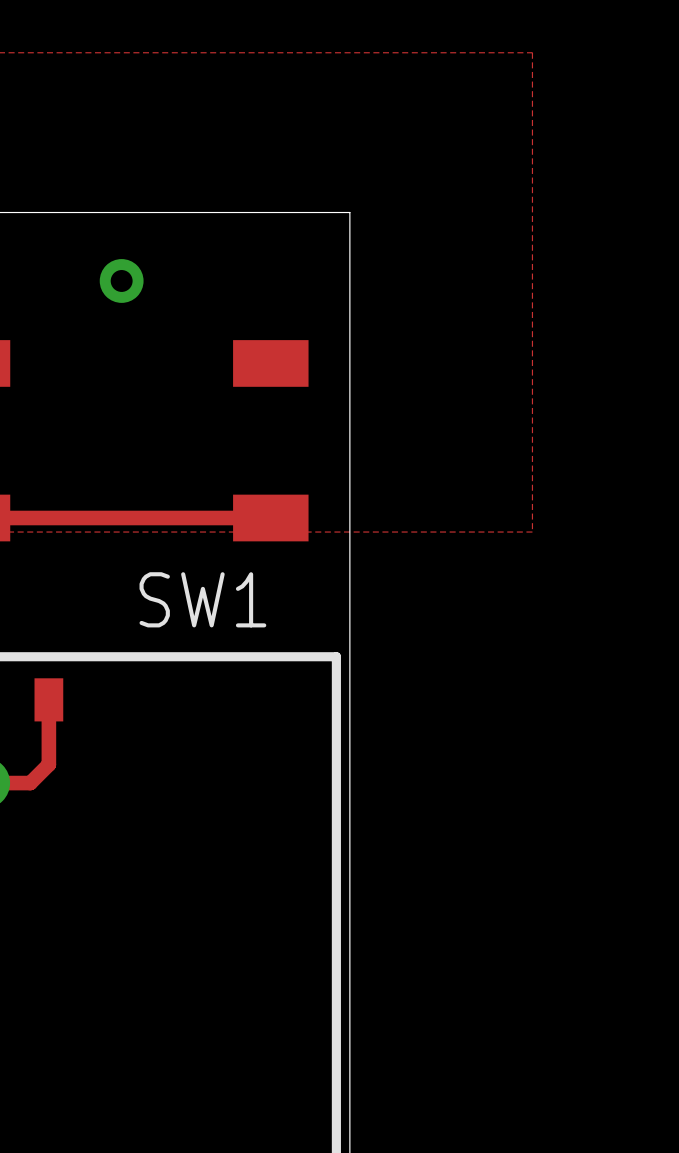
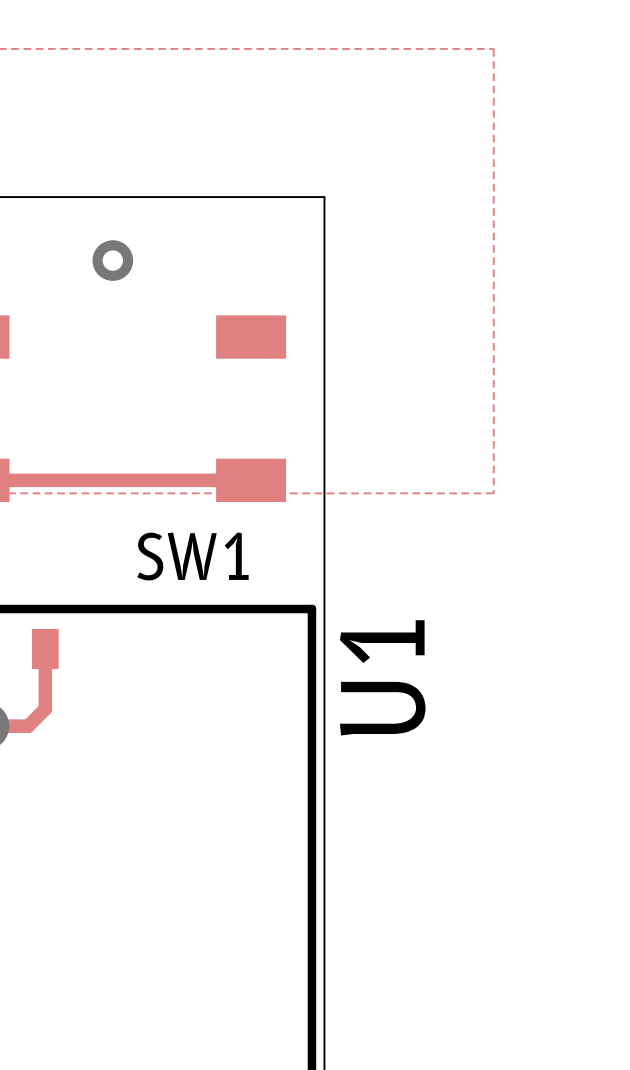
U1 name: none -> U1 (382, 677)

